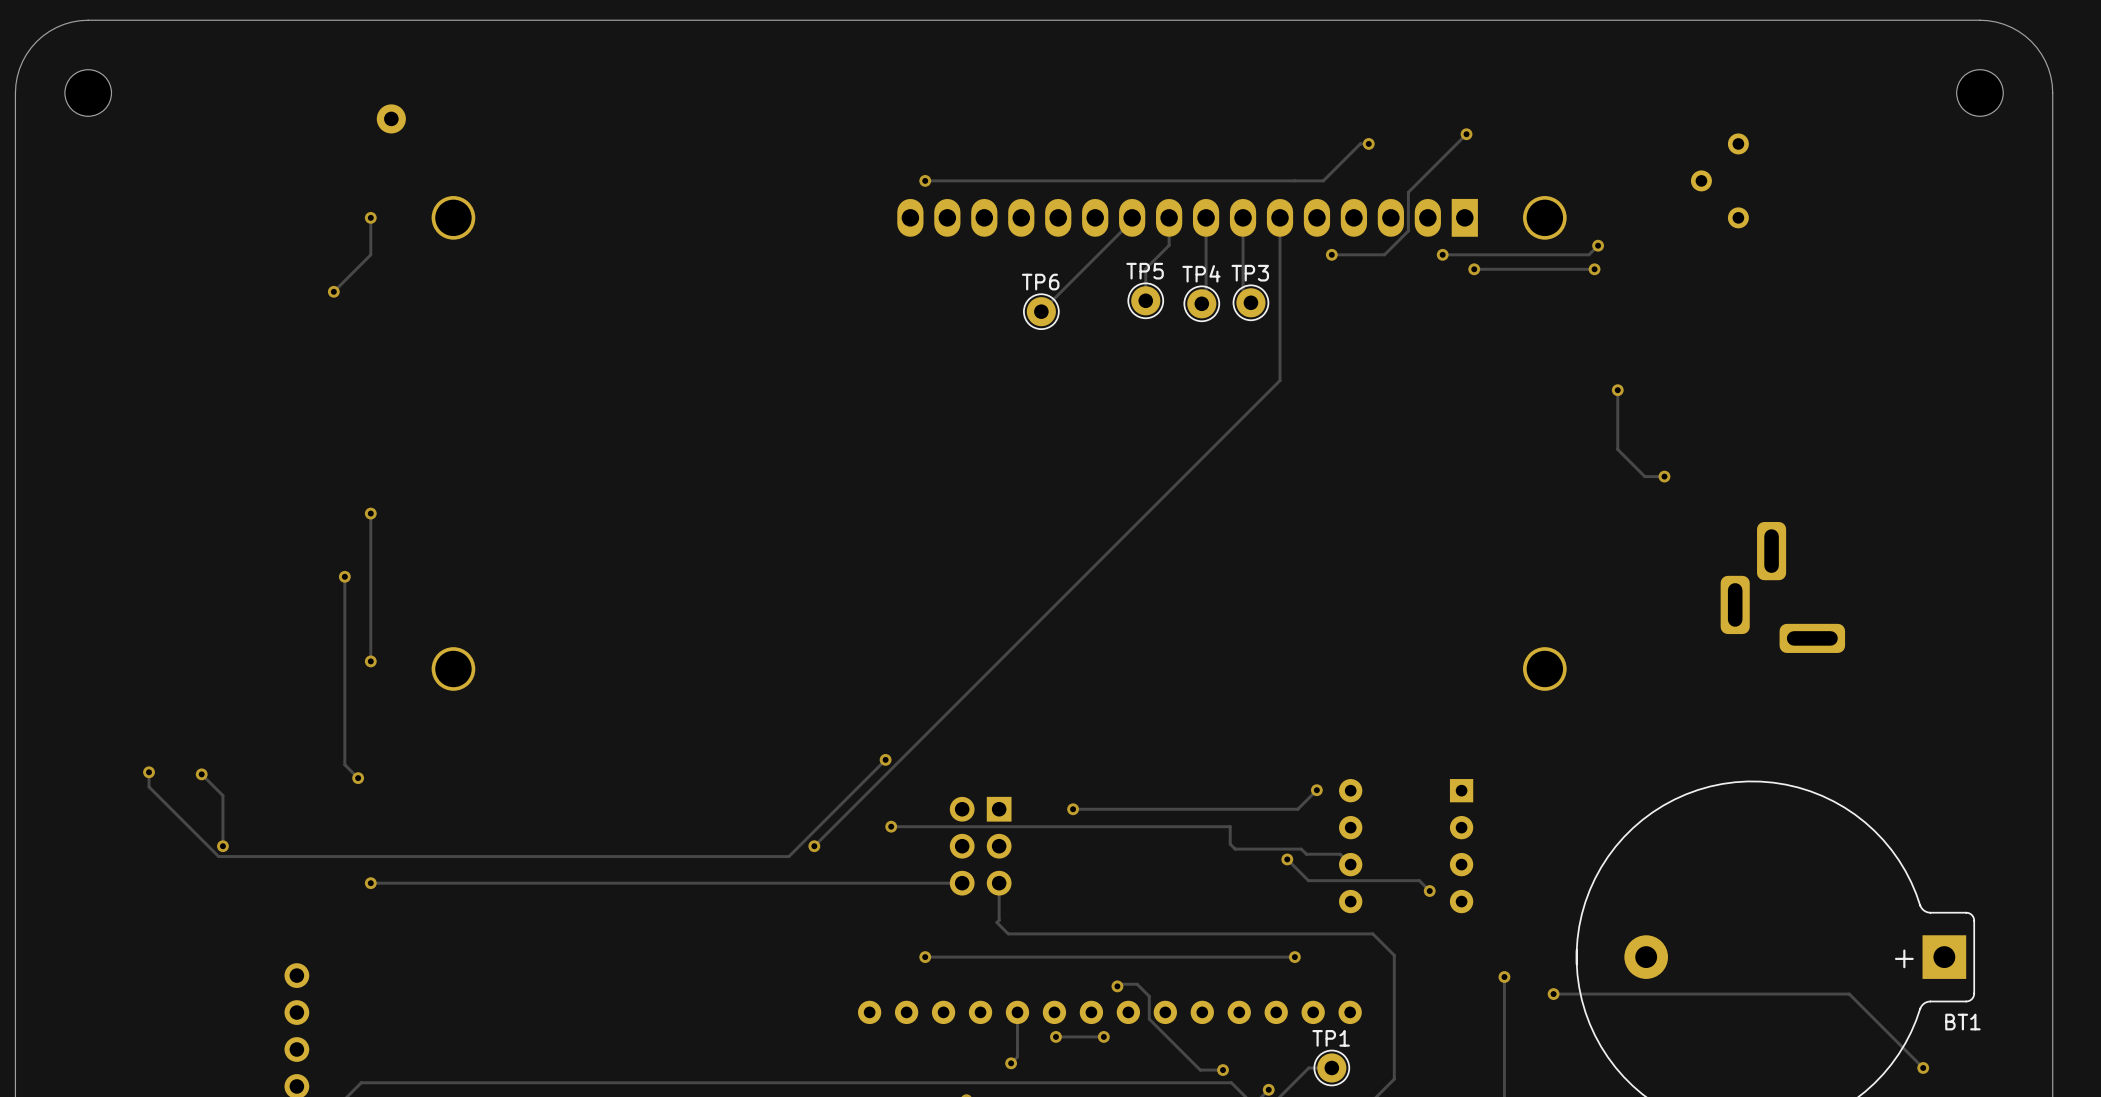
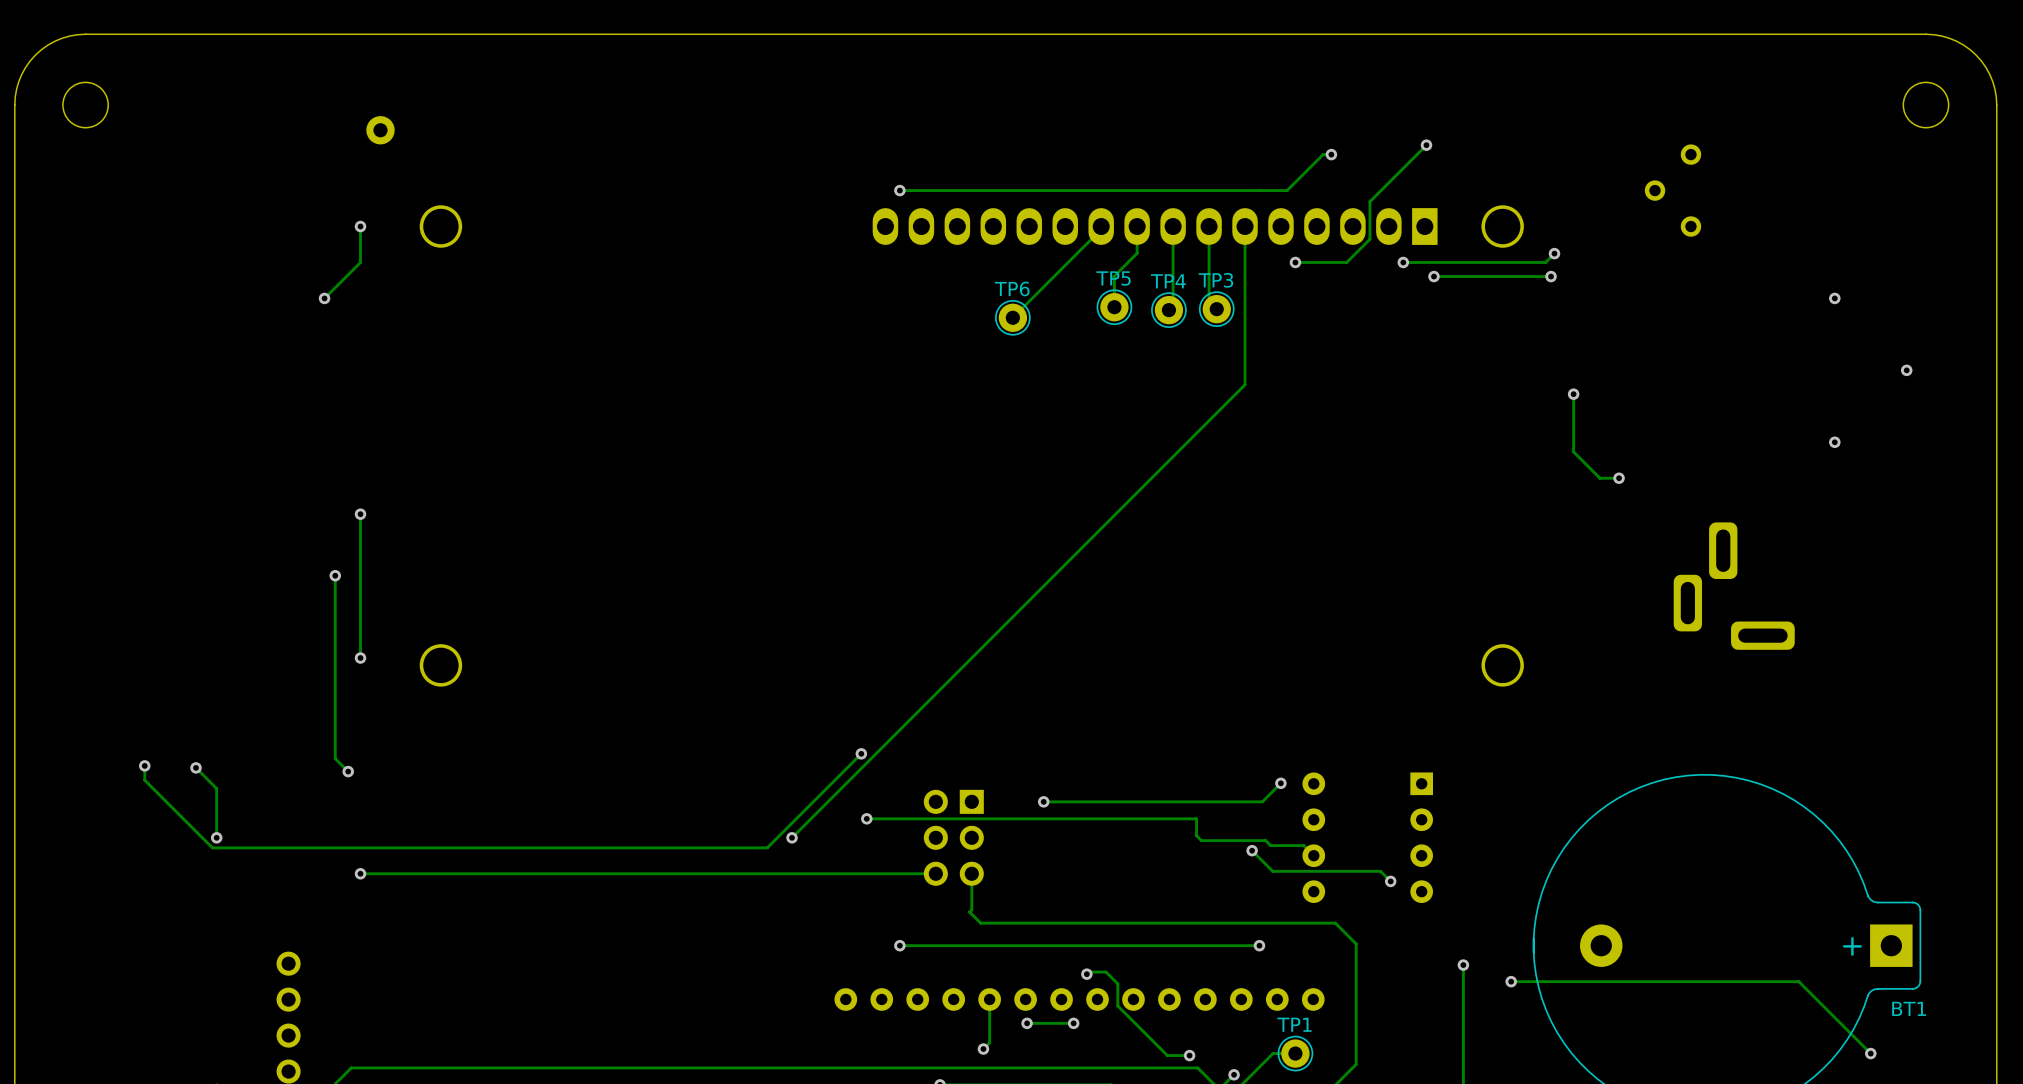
via: none -> (1834, 298)
via: none -> (1906, 370)
via: none -> (1834, 442)

